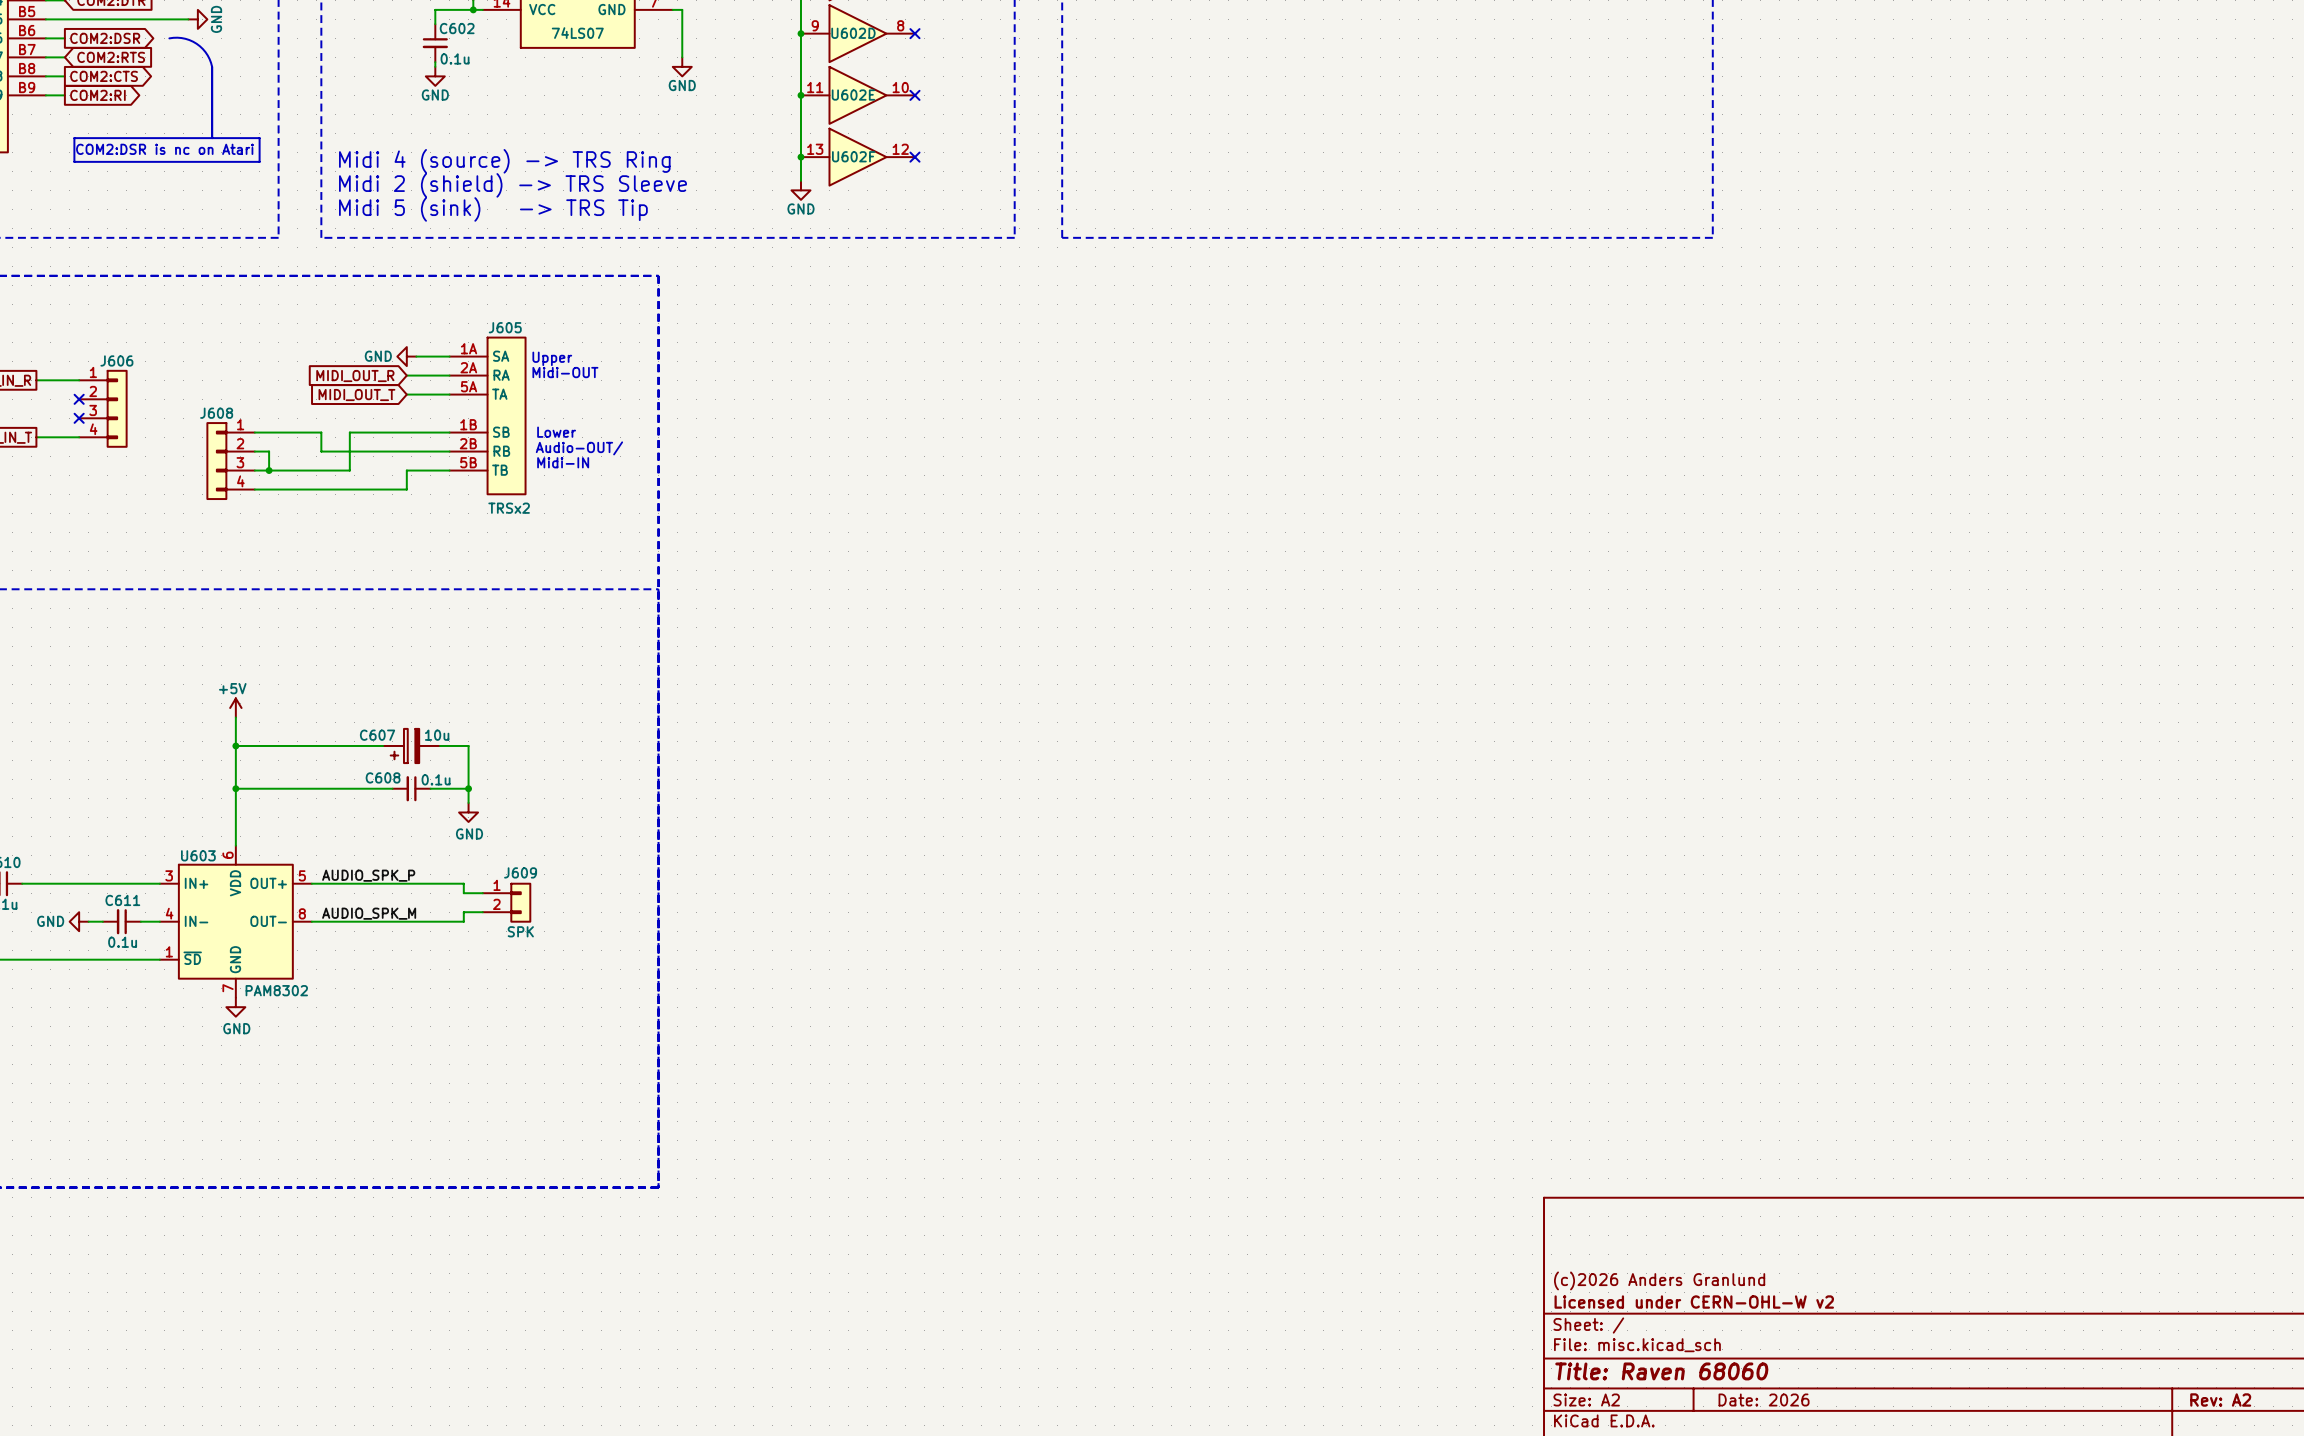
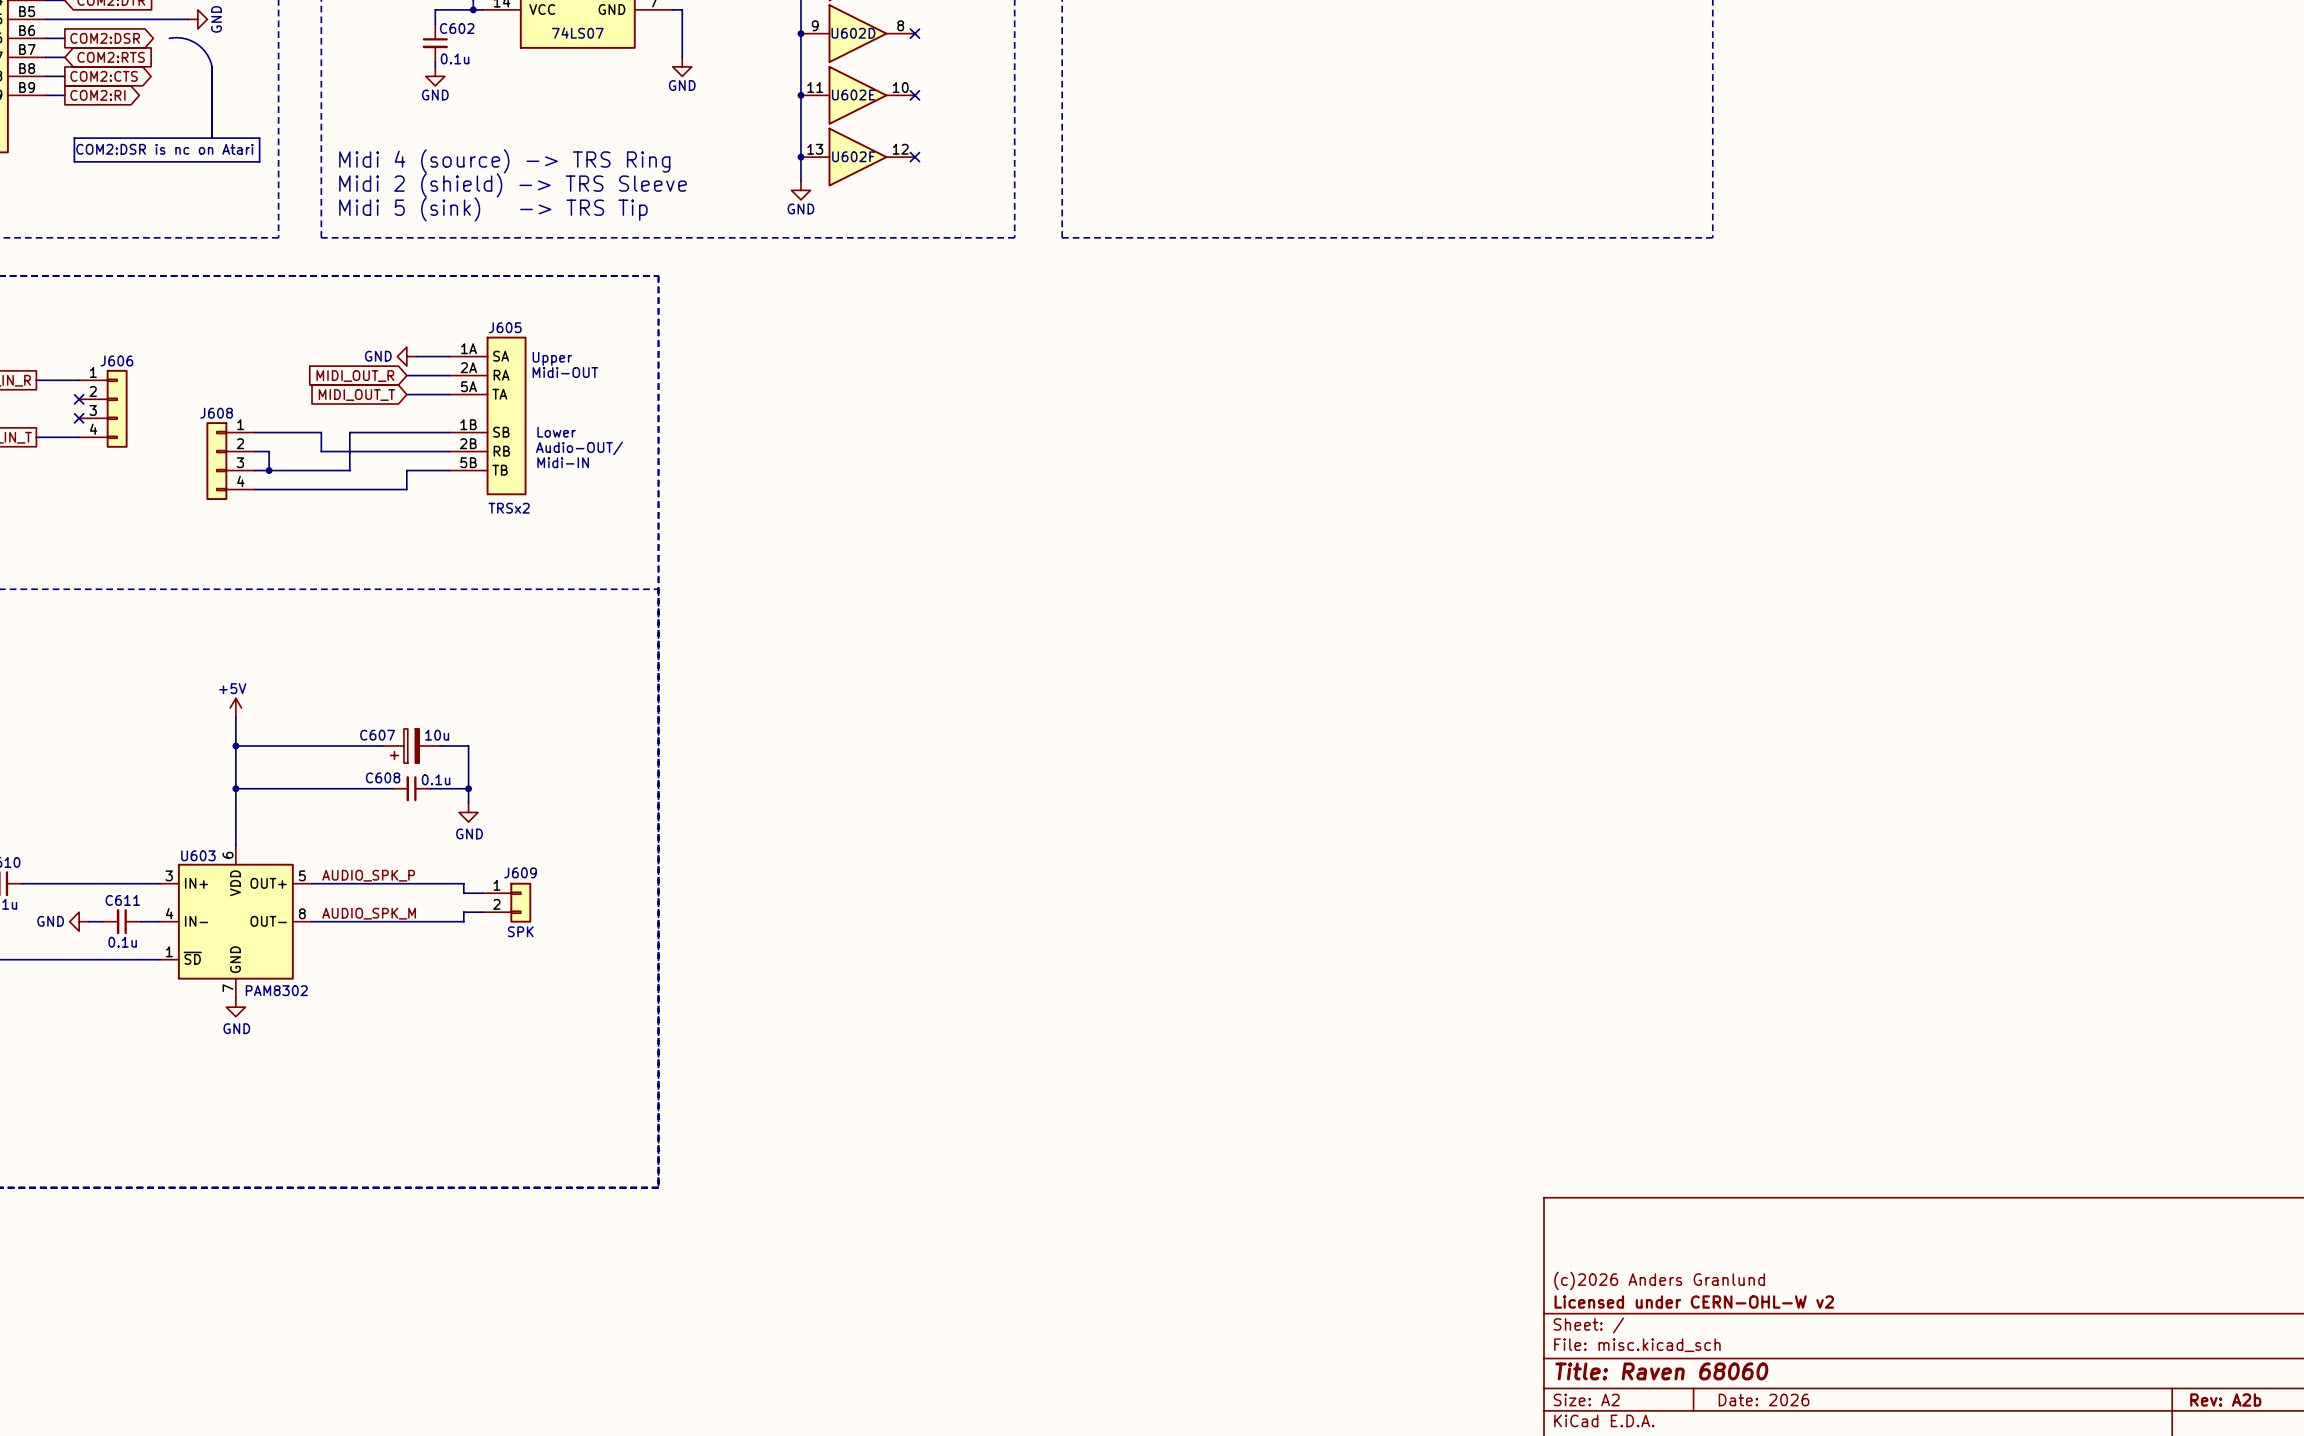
title block: Rev: A2 (2220, 1399) -> Rev: A2b (2225, 1399)

